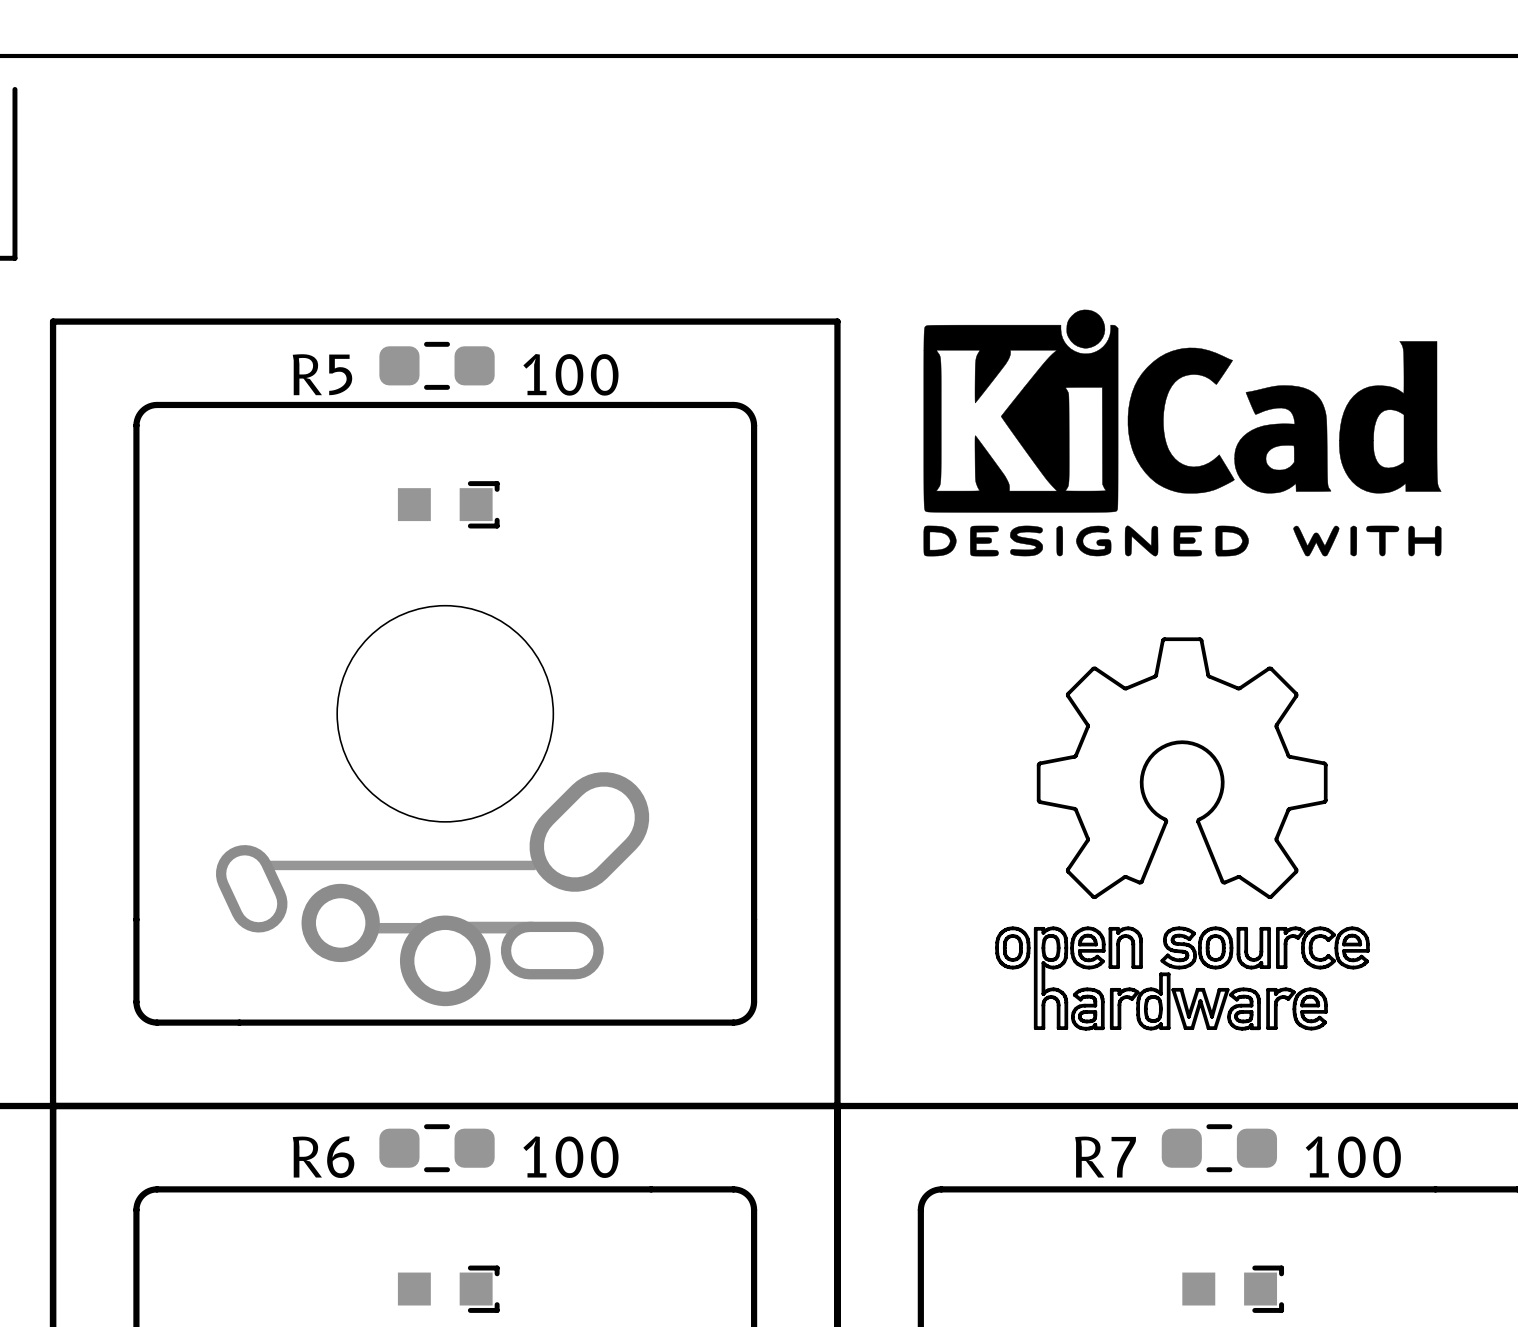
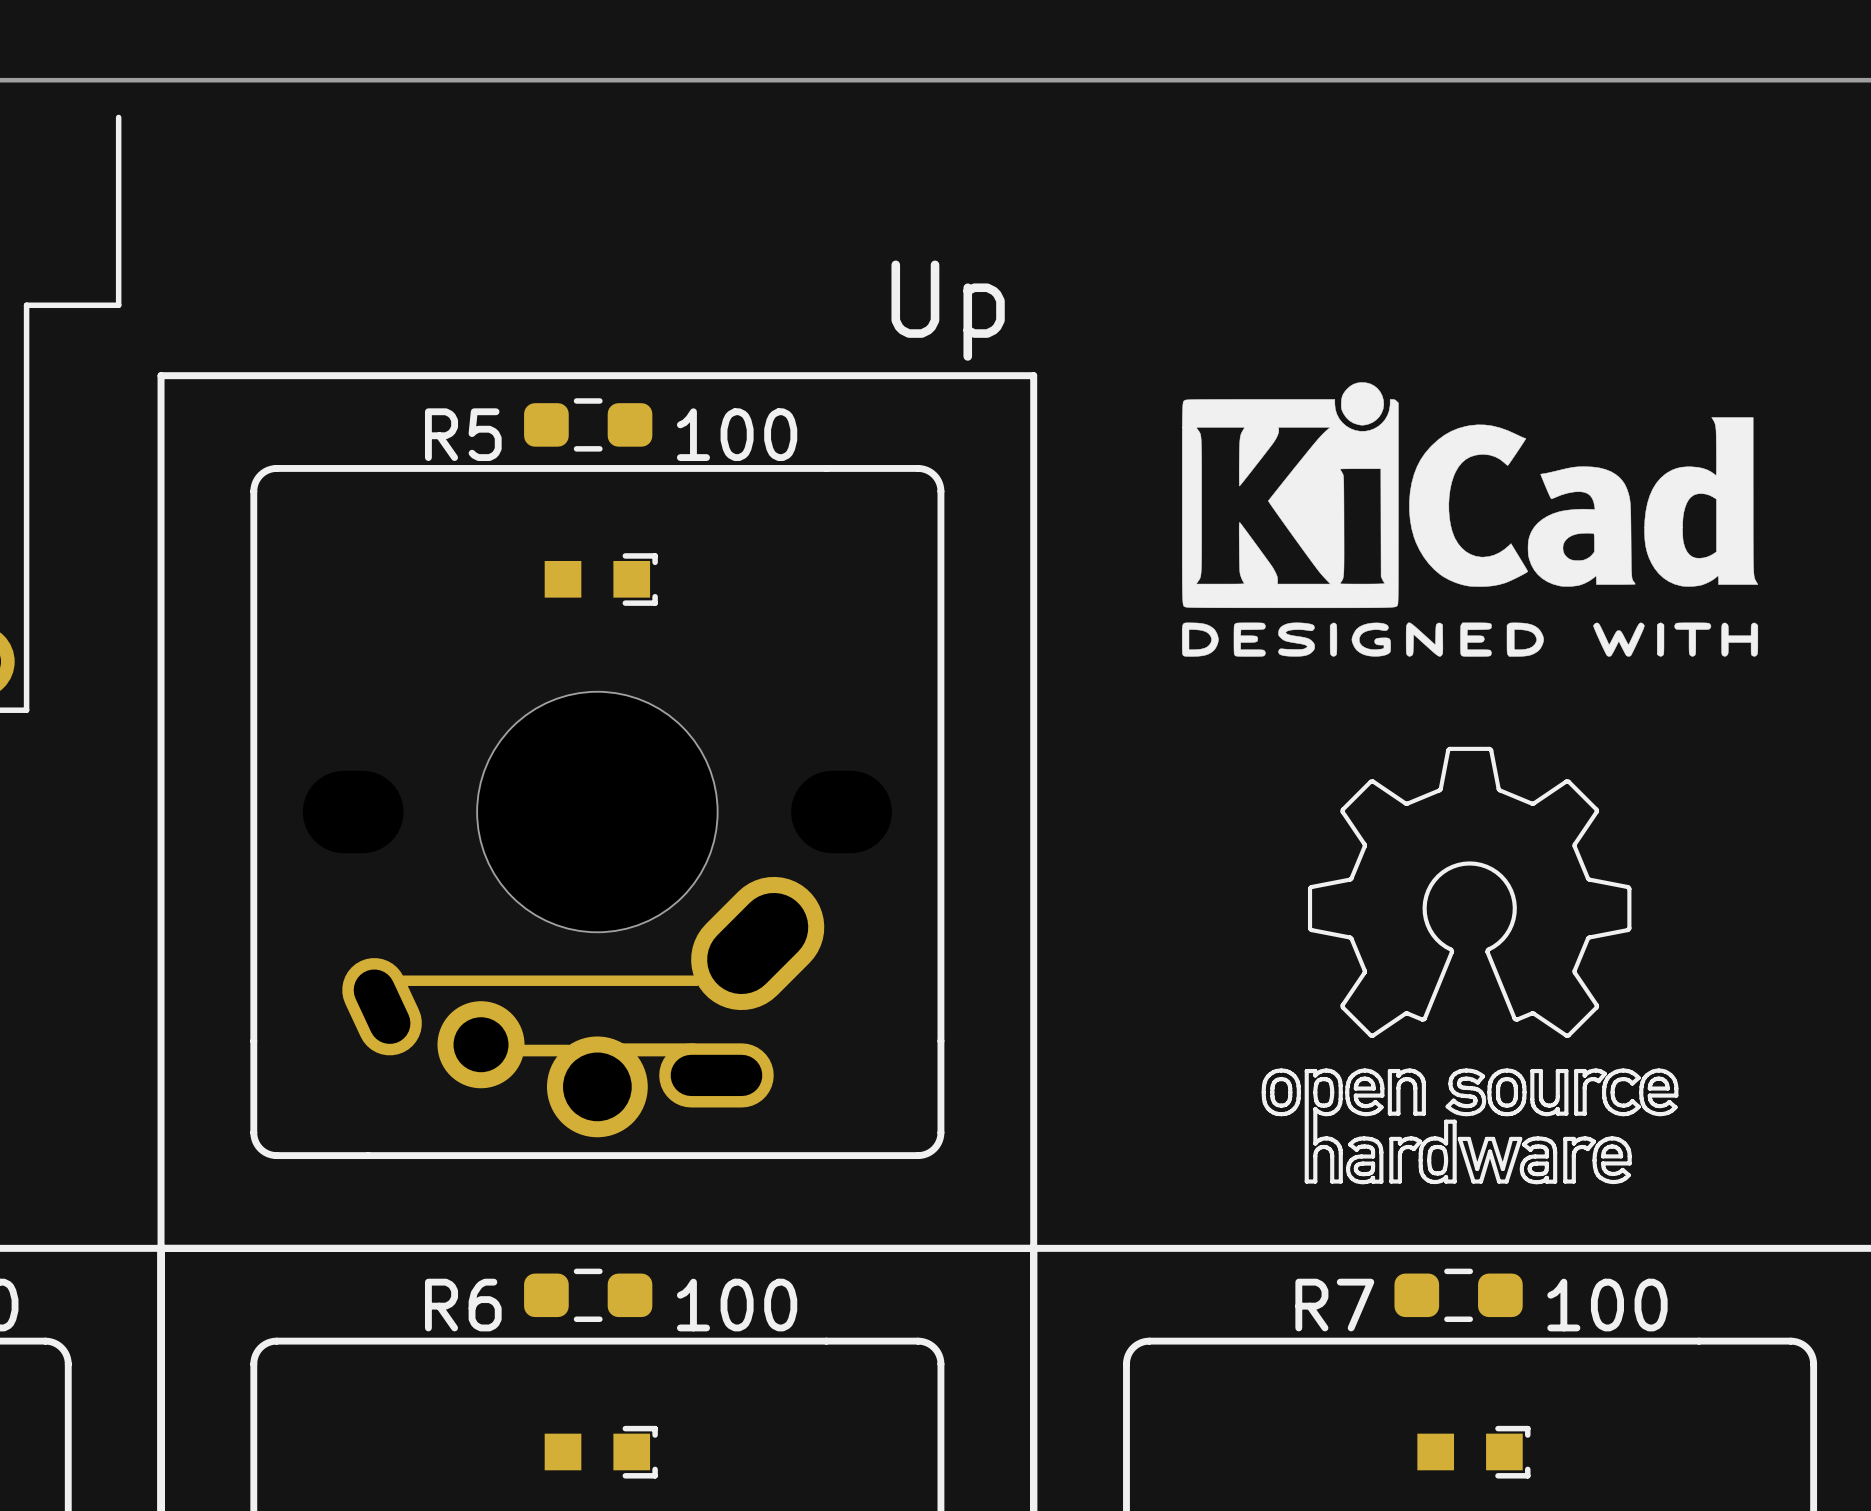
text: none -> Up (948, 310)
drawing position: (1182, 433) -> (1470, 519)
drawing position: (1182, 833) -> (1470, 965)

